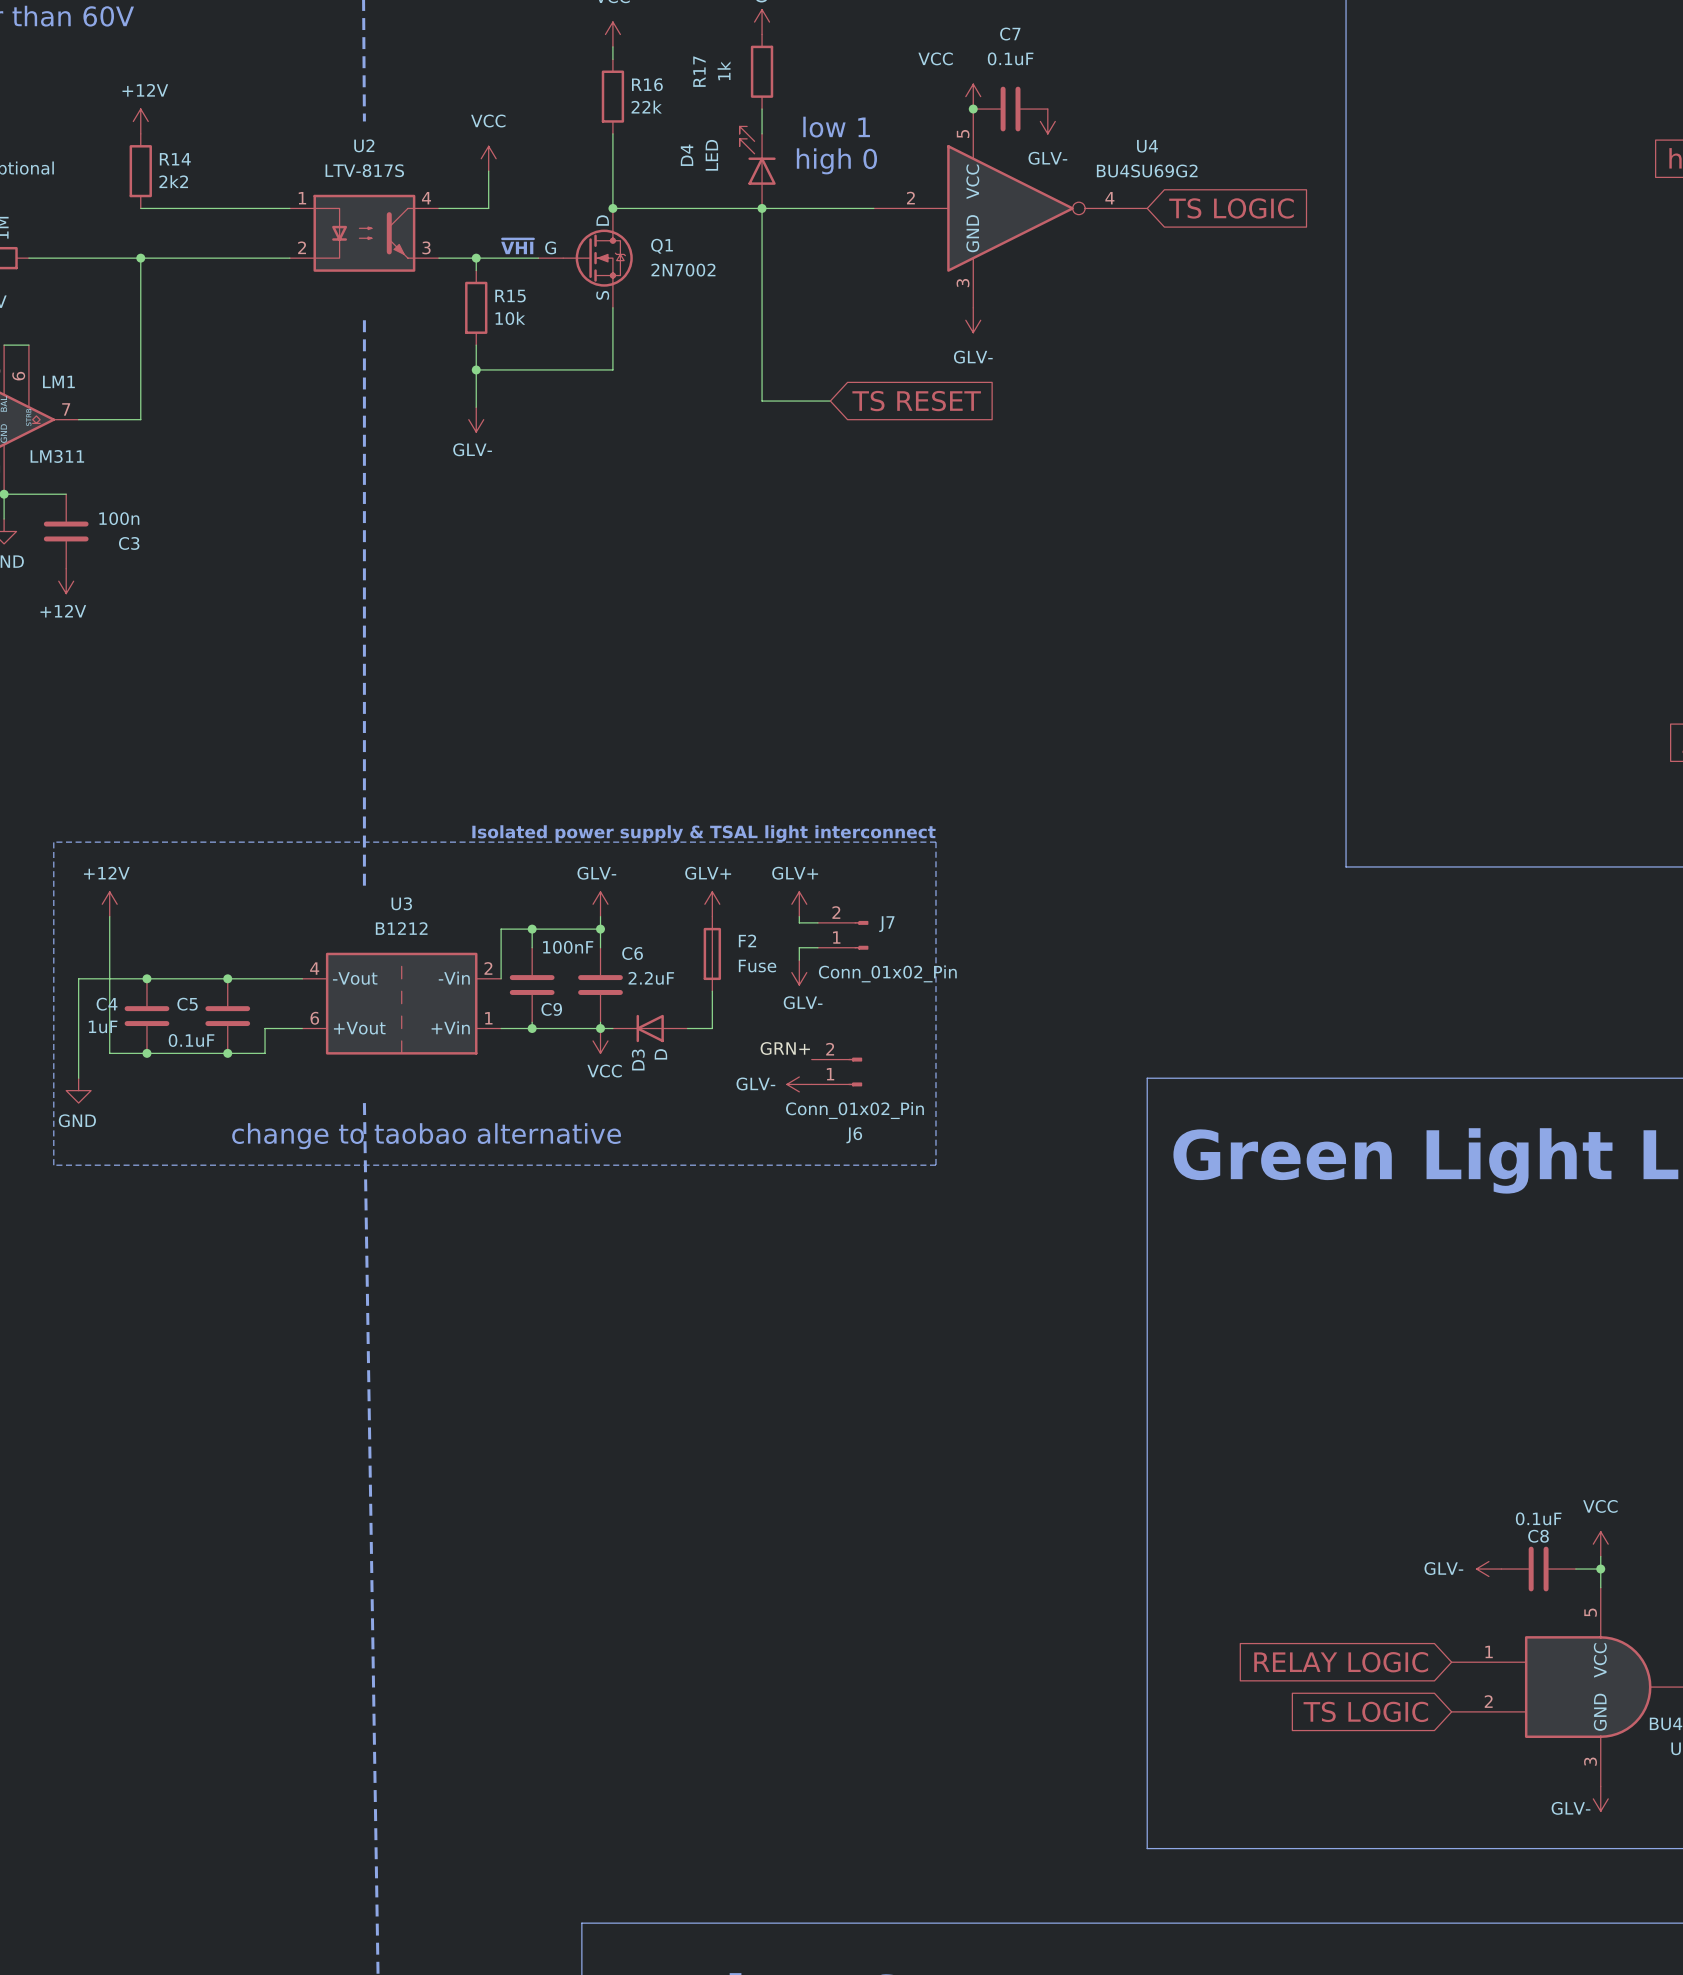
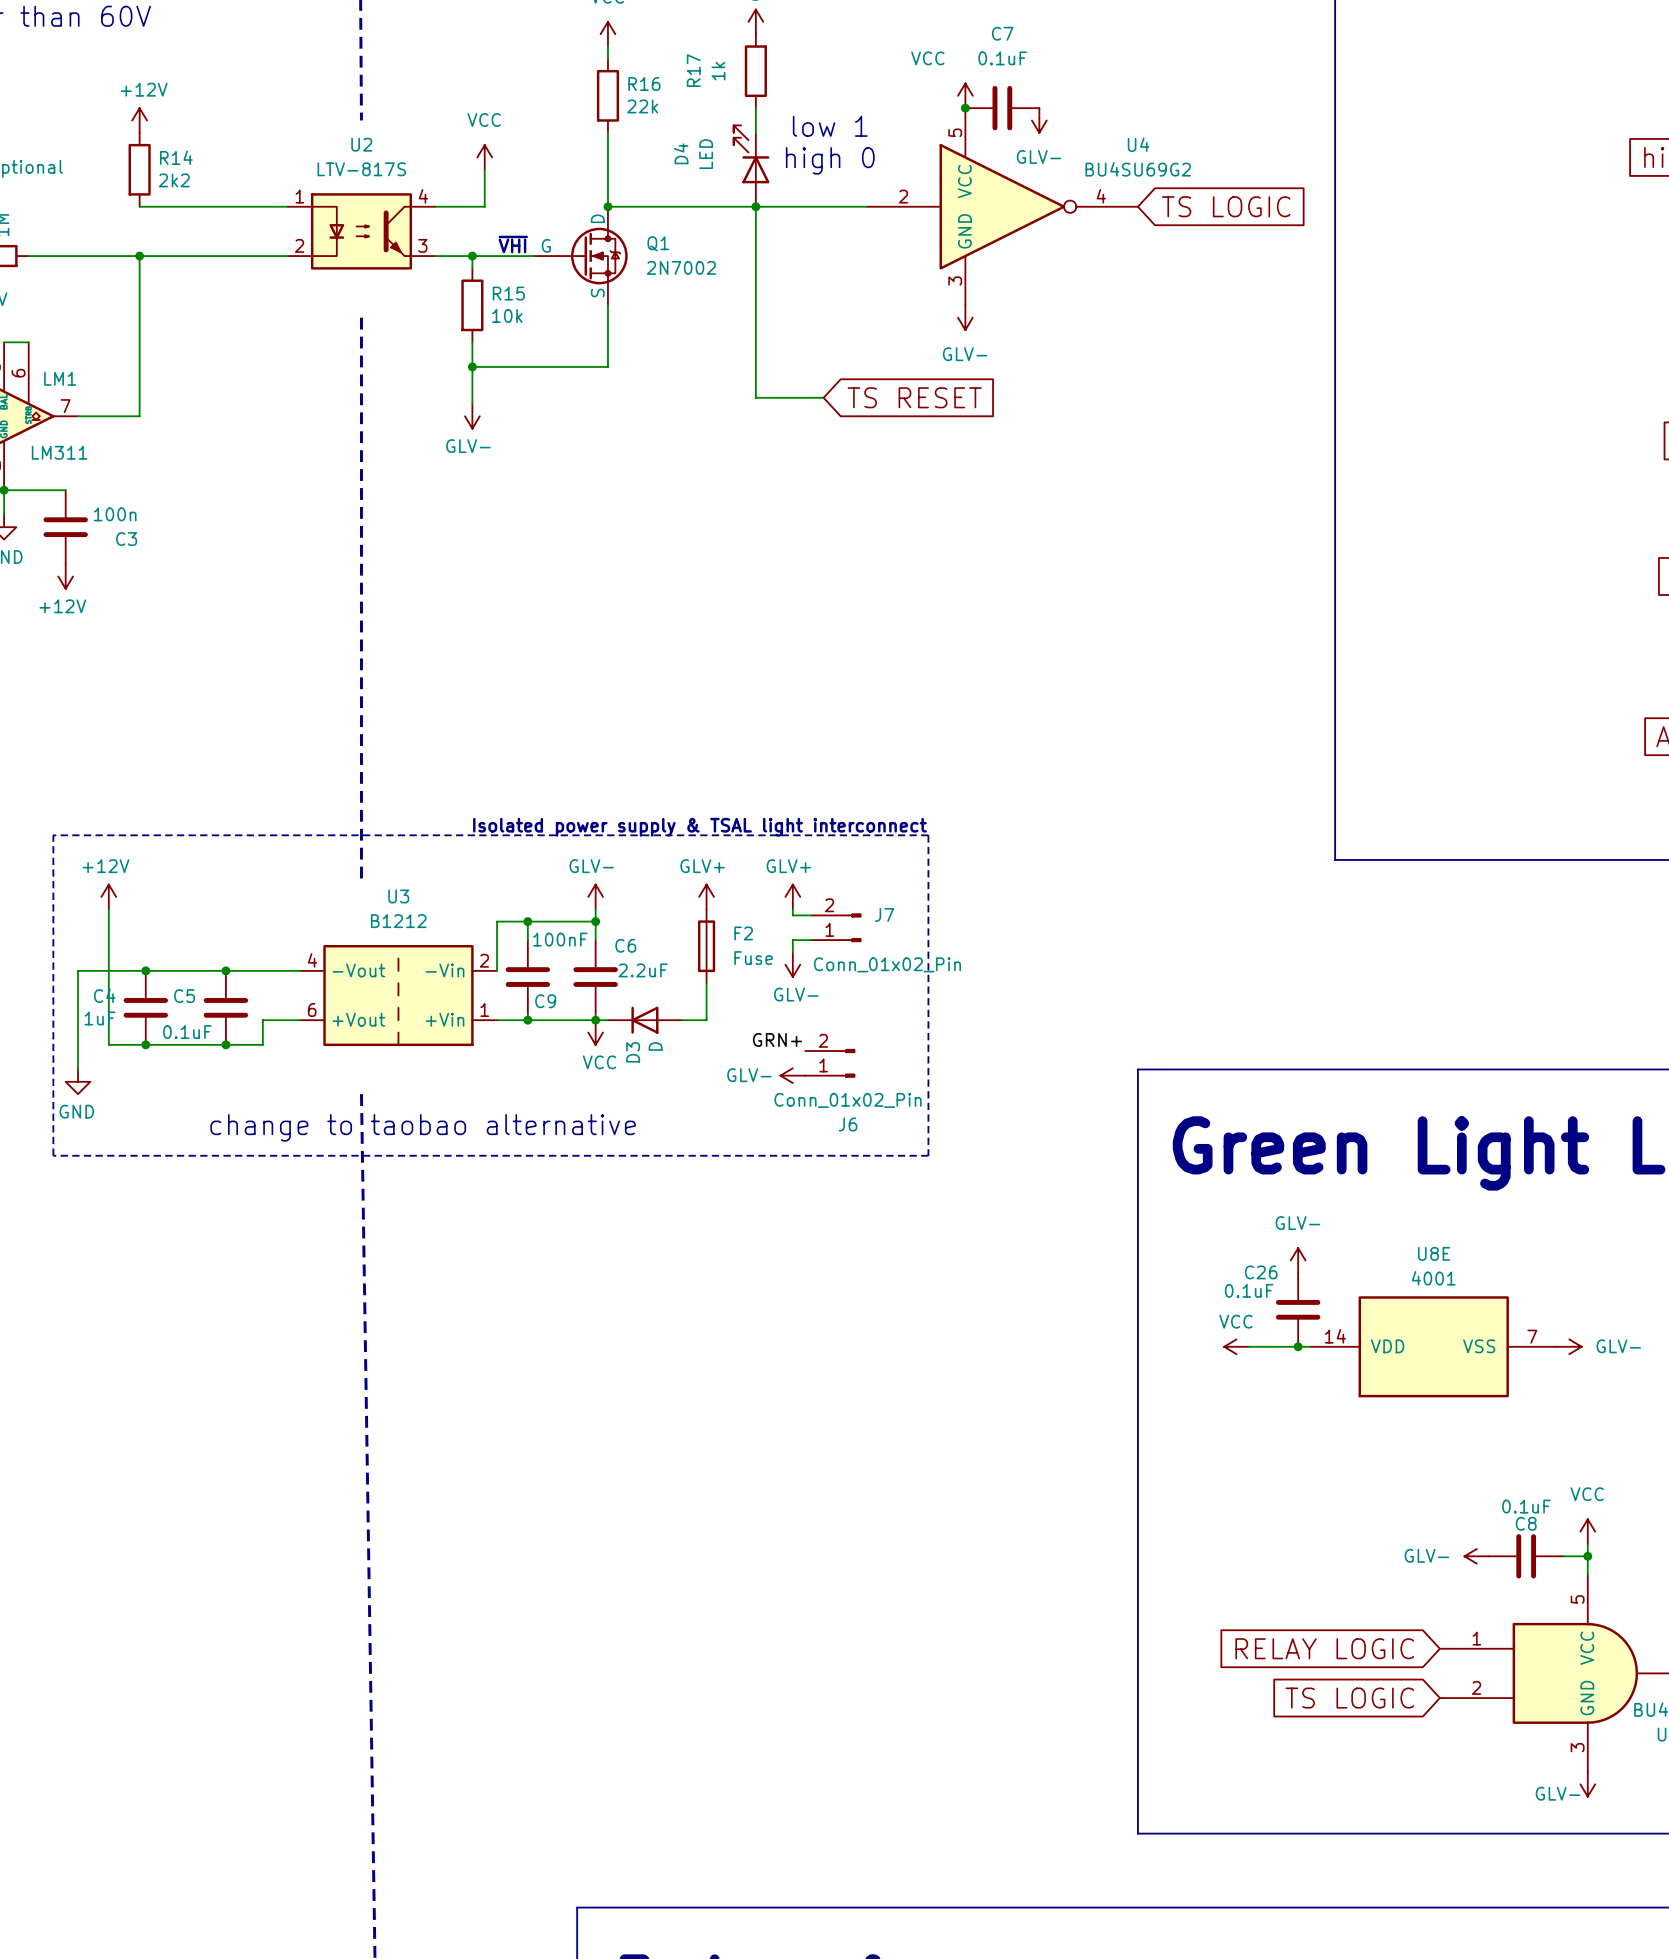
power symbol: none -> GLV- (1298, 1260)
C26: none -> 0.1uF (1298, 1309)
power symbol: none -> VCC (1236, 1346)
wire: none -> (1248, 1346) (1310, 1346)
junction: none -> (1298, 1346)
U8E: none -> 4001 (1433, 1346)
power symbol: none -> GLV- (1569, 1346)

